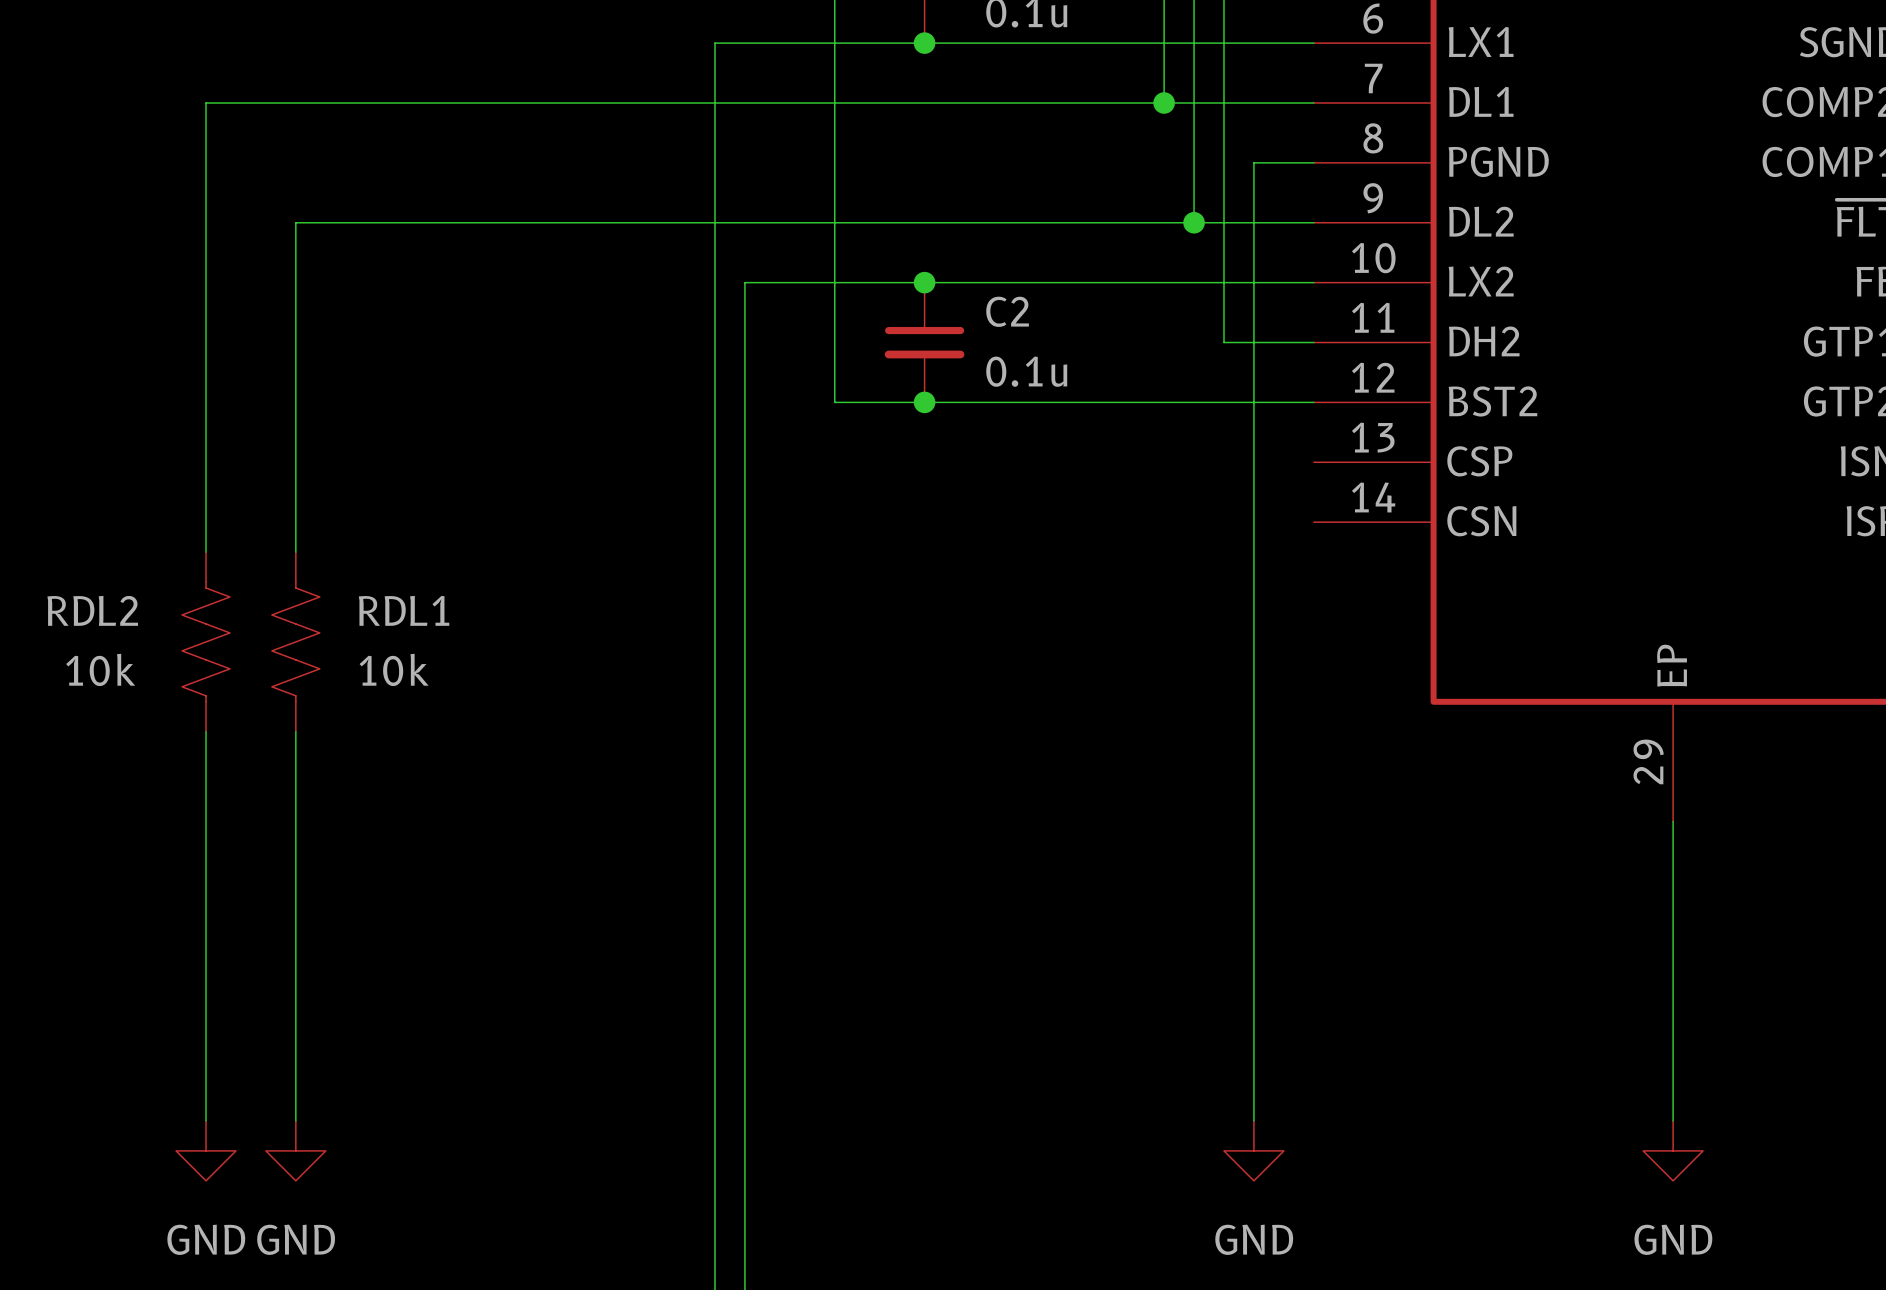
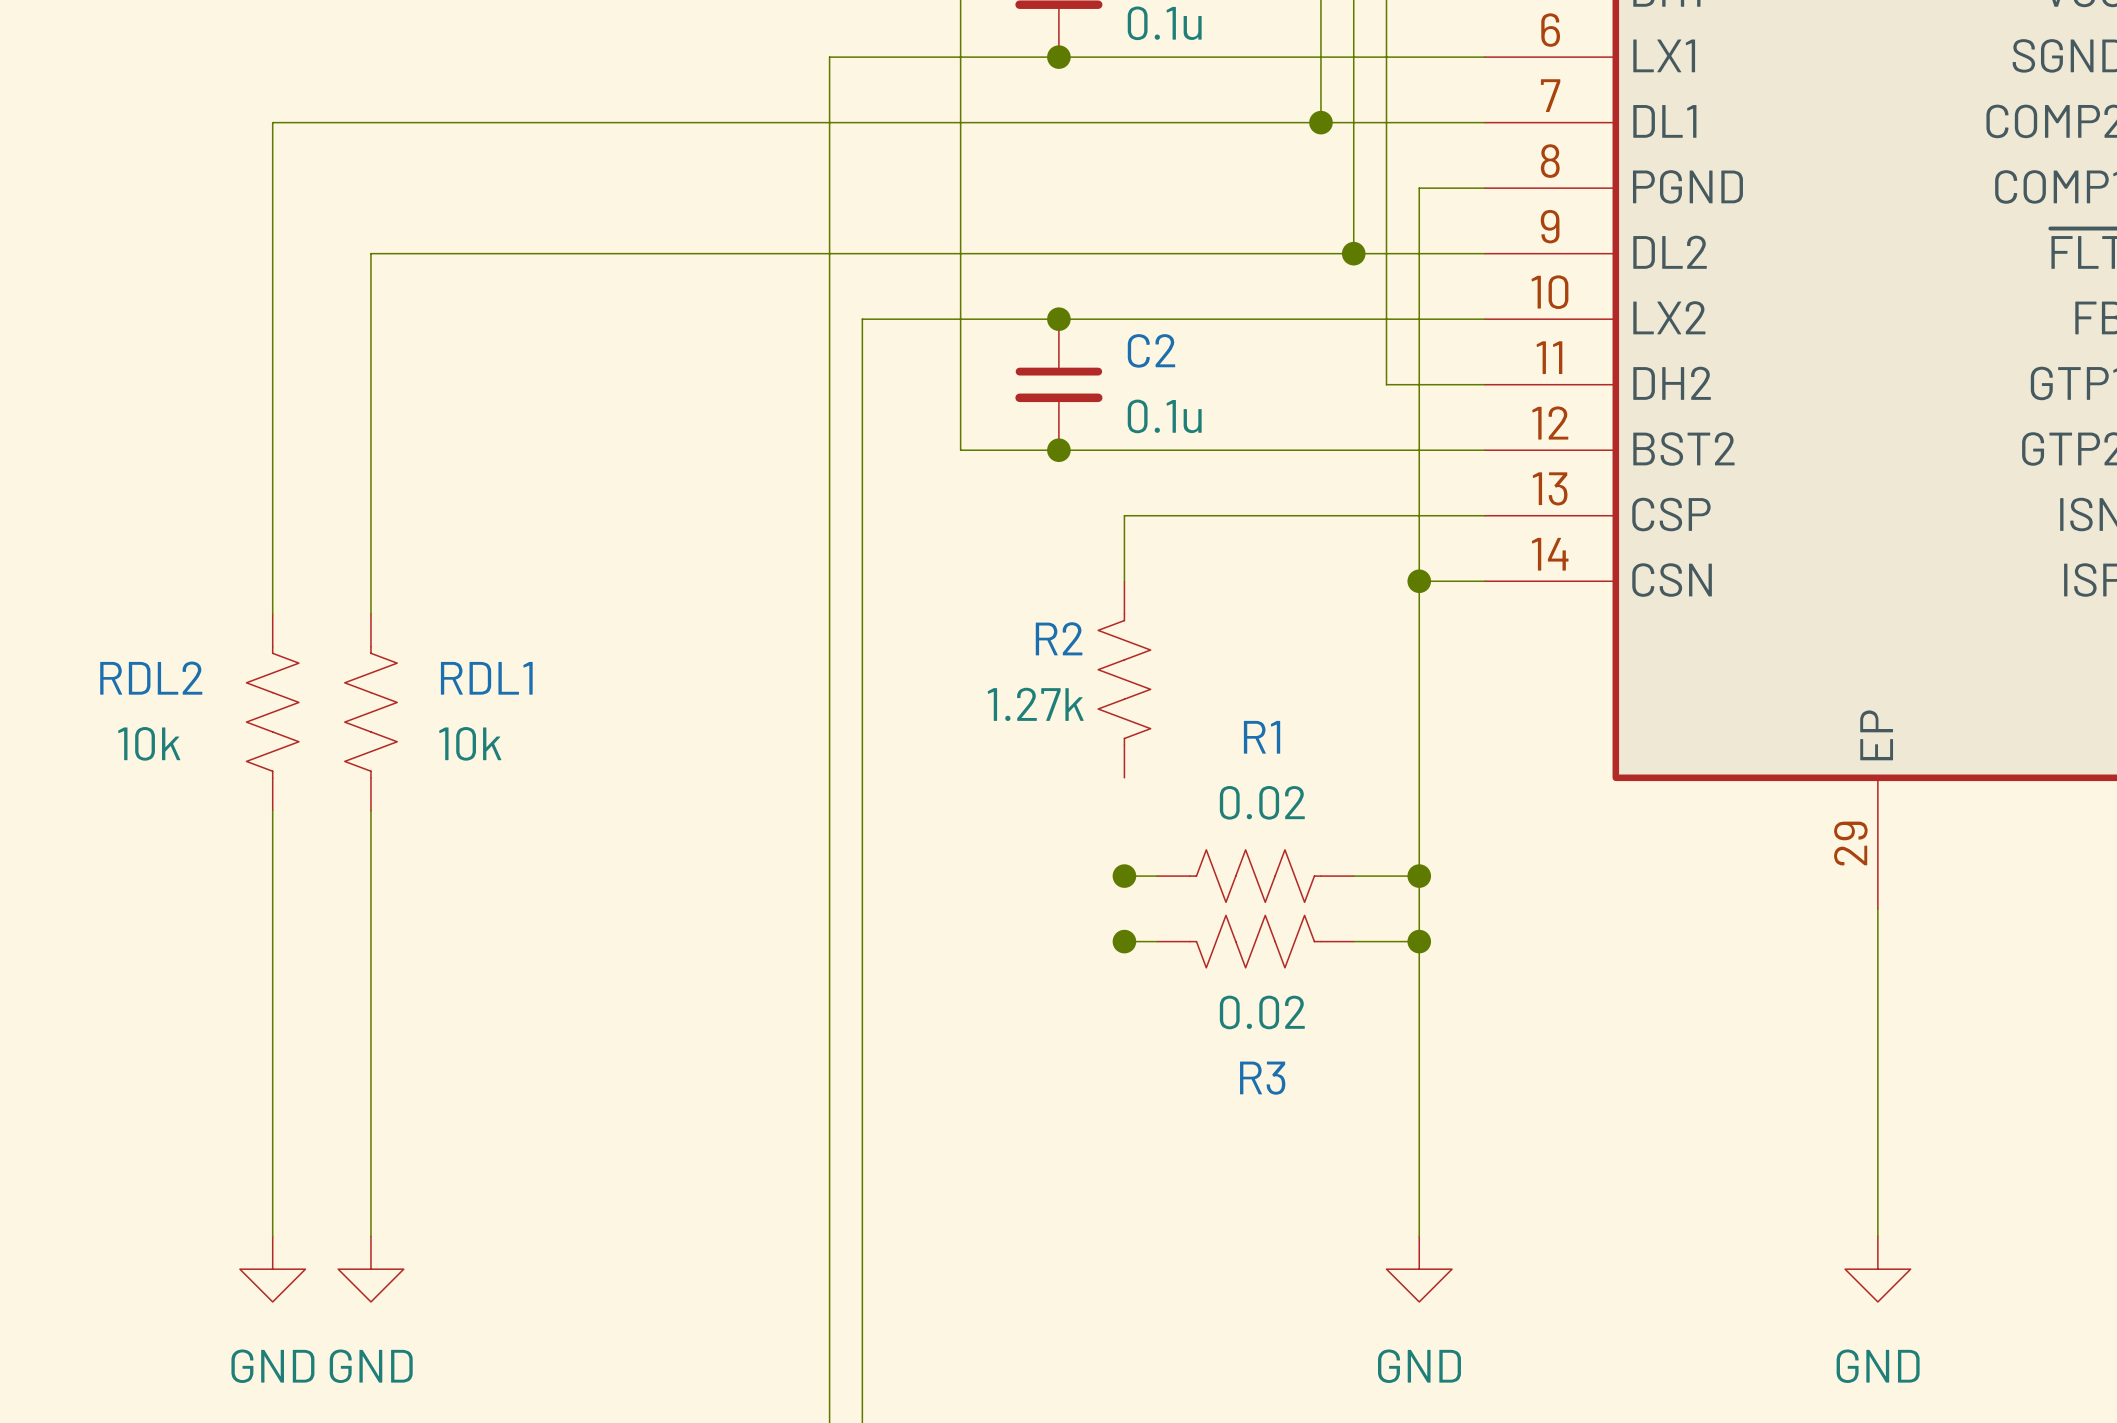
wire: none -> (1484, 515) (1124, 515) (1124, 581)
wire: none -> (1419, 581) (1484, 581)
junction: none -> (1419, 581)
R2: none -> 1.27k (1124, 679)
wire: none -> (1124, 876) (1157, 876)
junction: none -> (1124, 876)
R1: none -> 0.02 (1255, 876)
wire: none -> (1353, 876) (1419, 876)
junction: none -> (1419, 876)
wire: none -> (1124, 941) (1157, 941)
junction: none -> (1124, 941)
R3: none -> 0.02 (1255, 941)
wire: none -> (1353, 941) (1419, 941)
junction: none -> (1419, 941)

